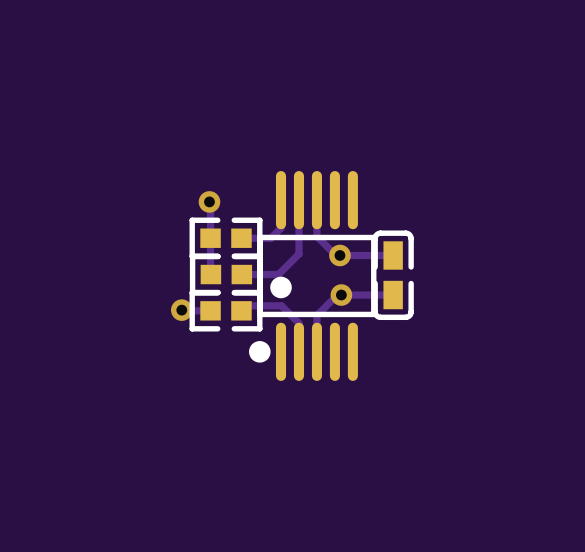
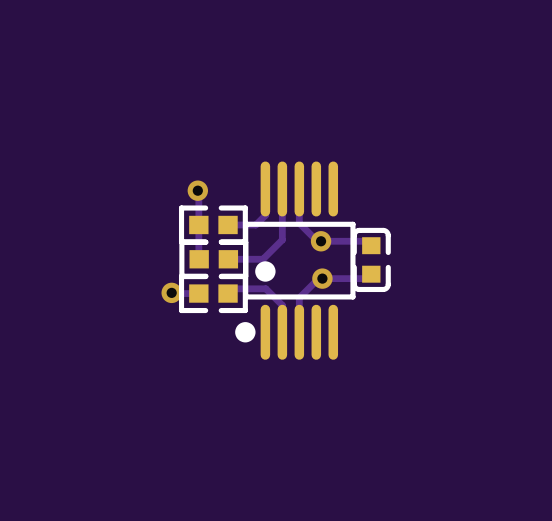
part footprint: [372, 230, 414, 321] -> [351, 227, 391, 293]

